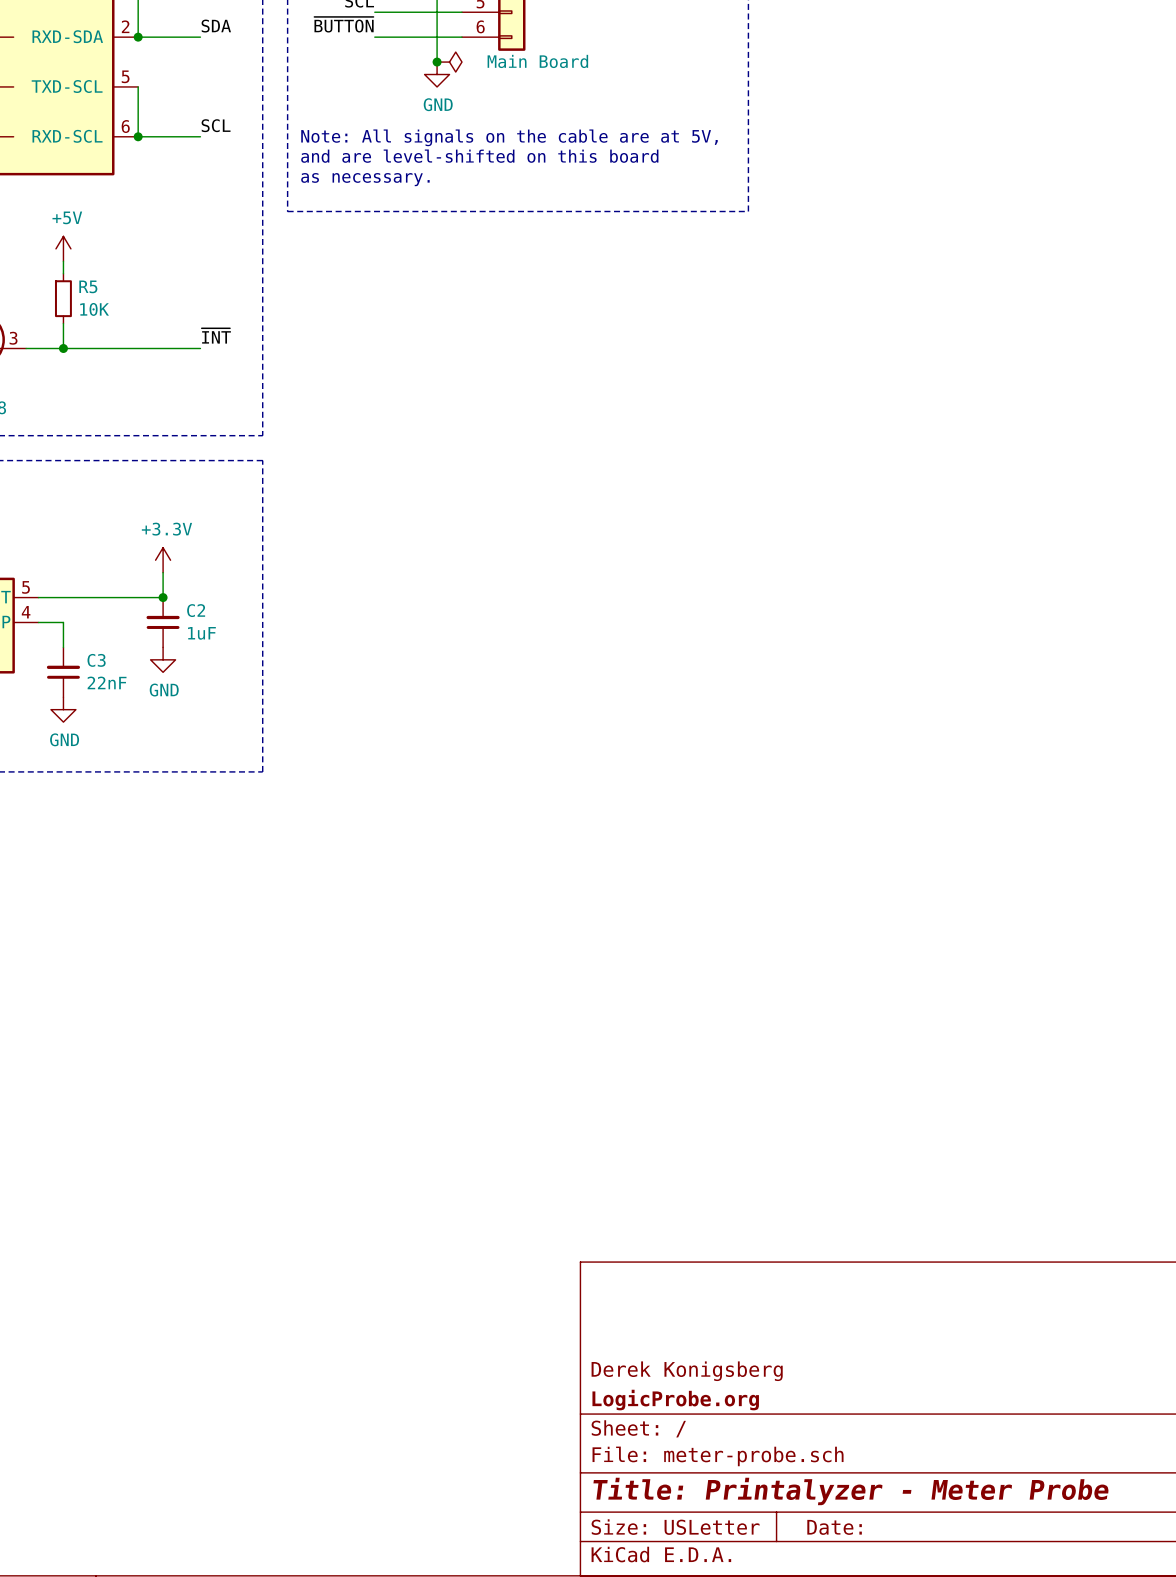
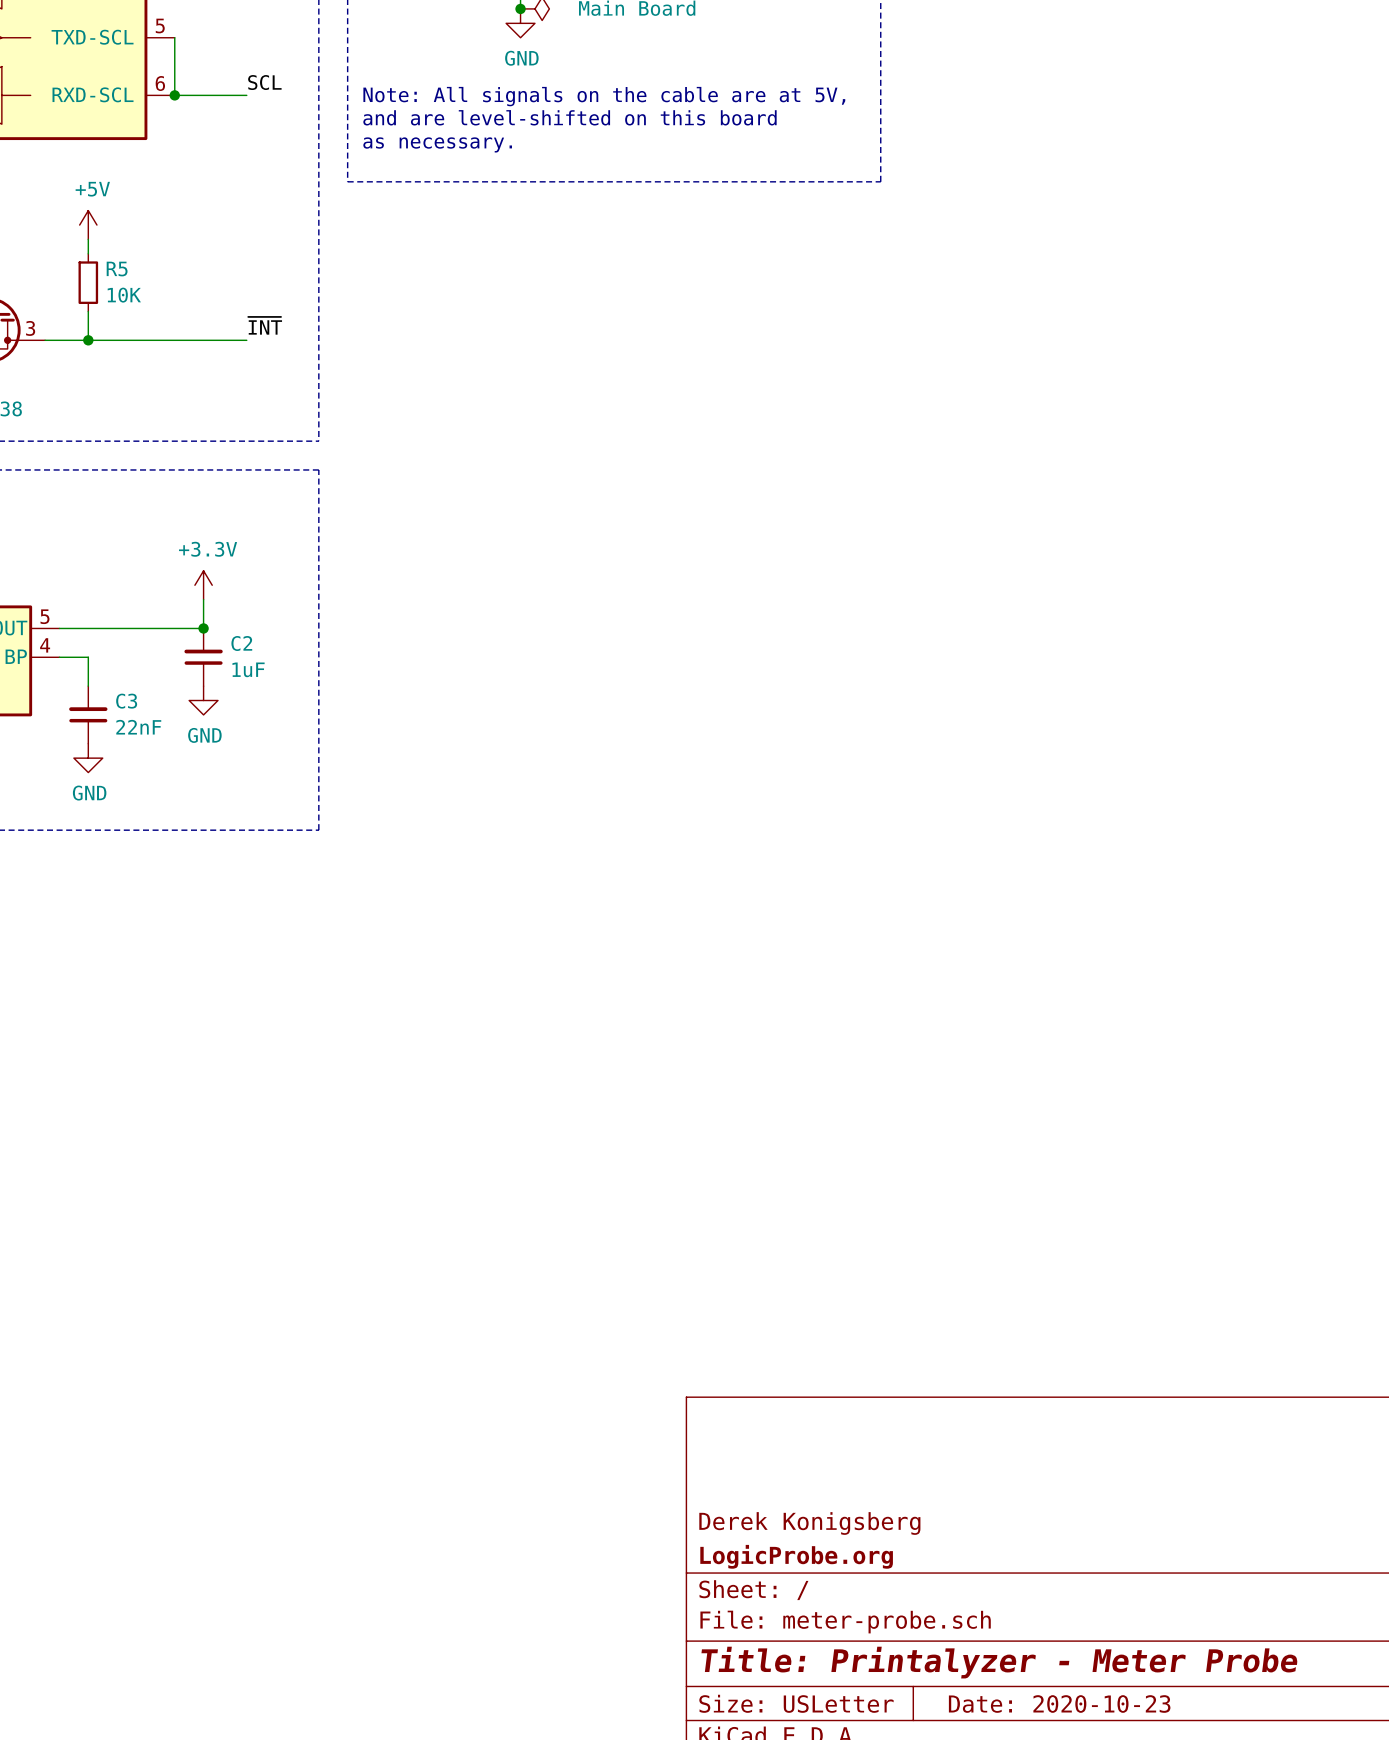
title block: Date: (834, 1527) -> Date: 2020-10-23 (1059, 1704)

